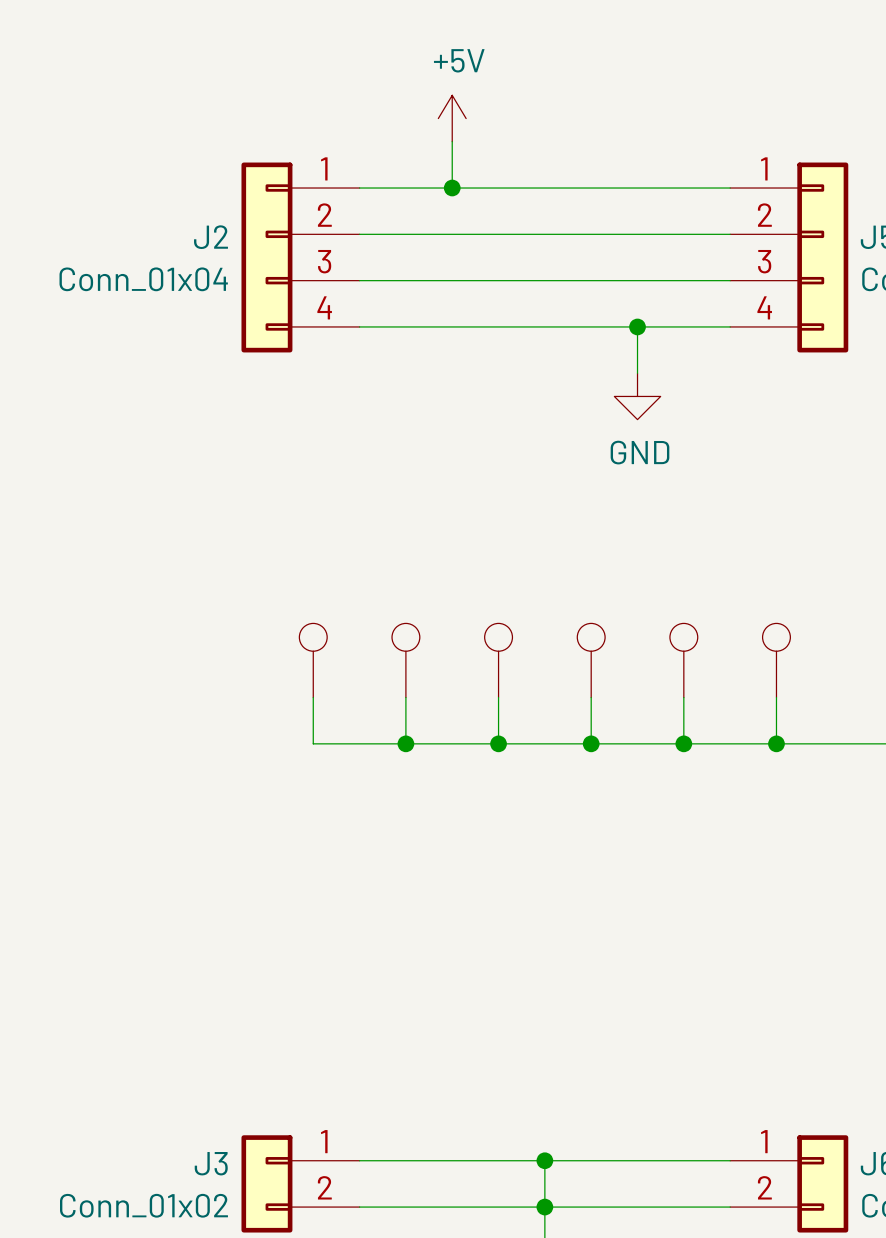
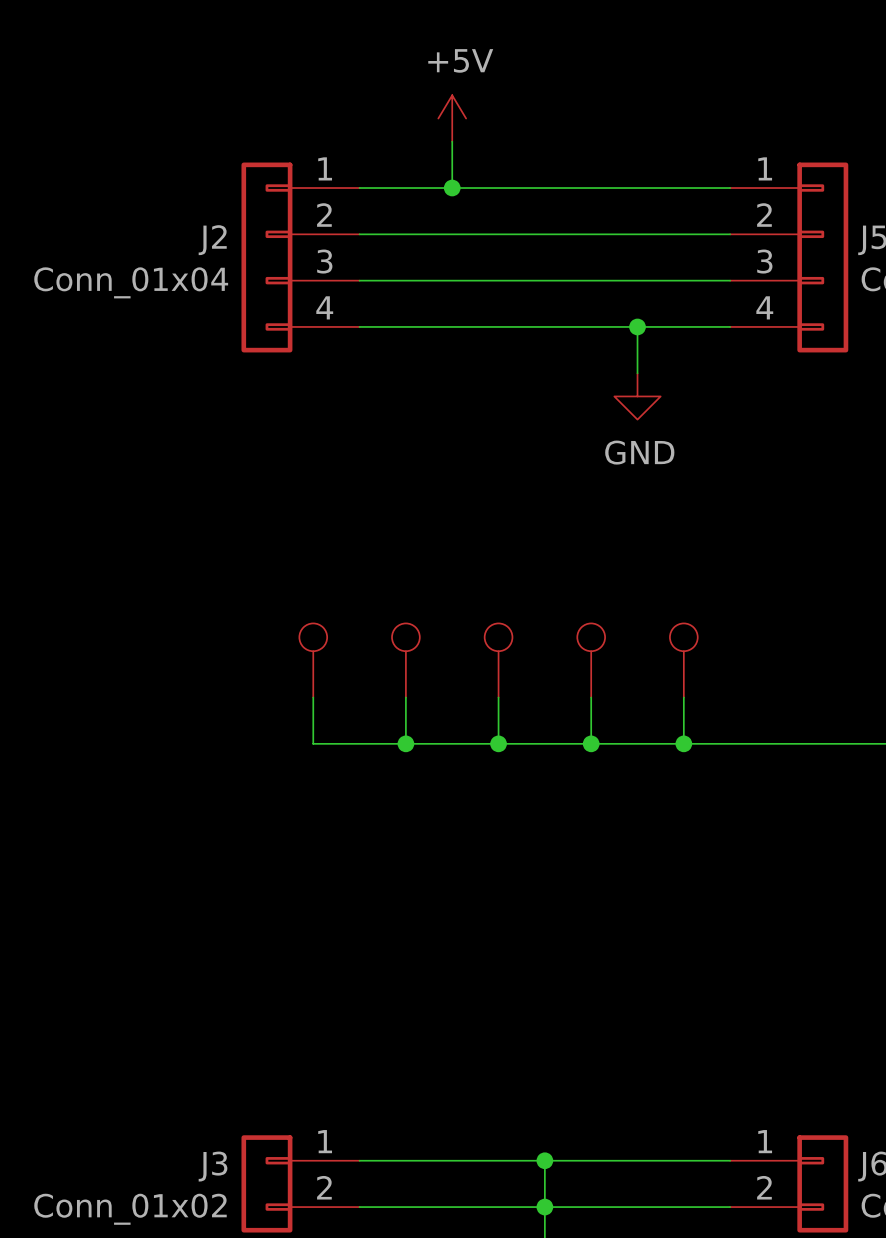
part: (776, 660) -> none
wire: (776, 697) (776, 743) -> none
junction: (776, 743) -> none

